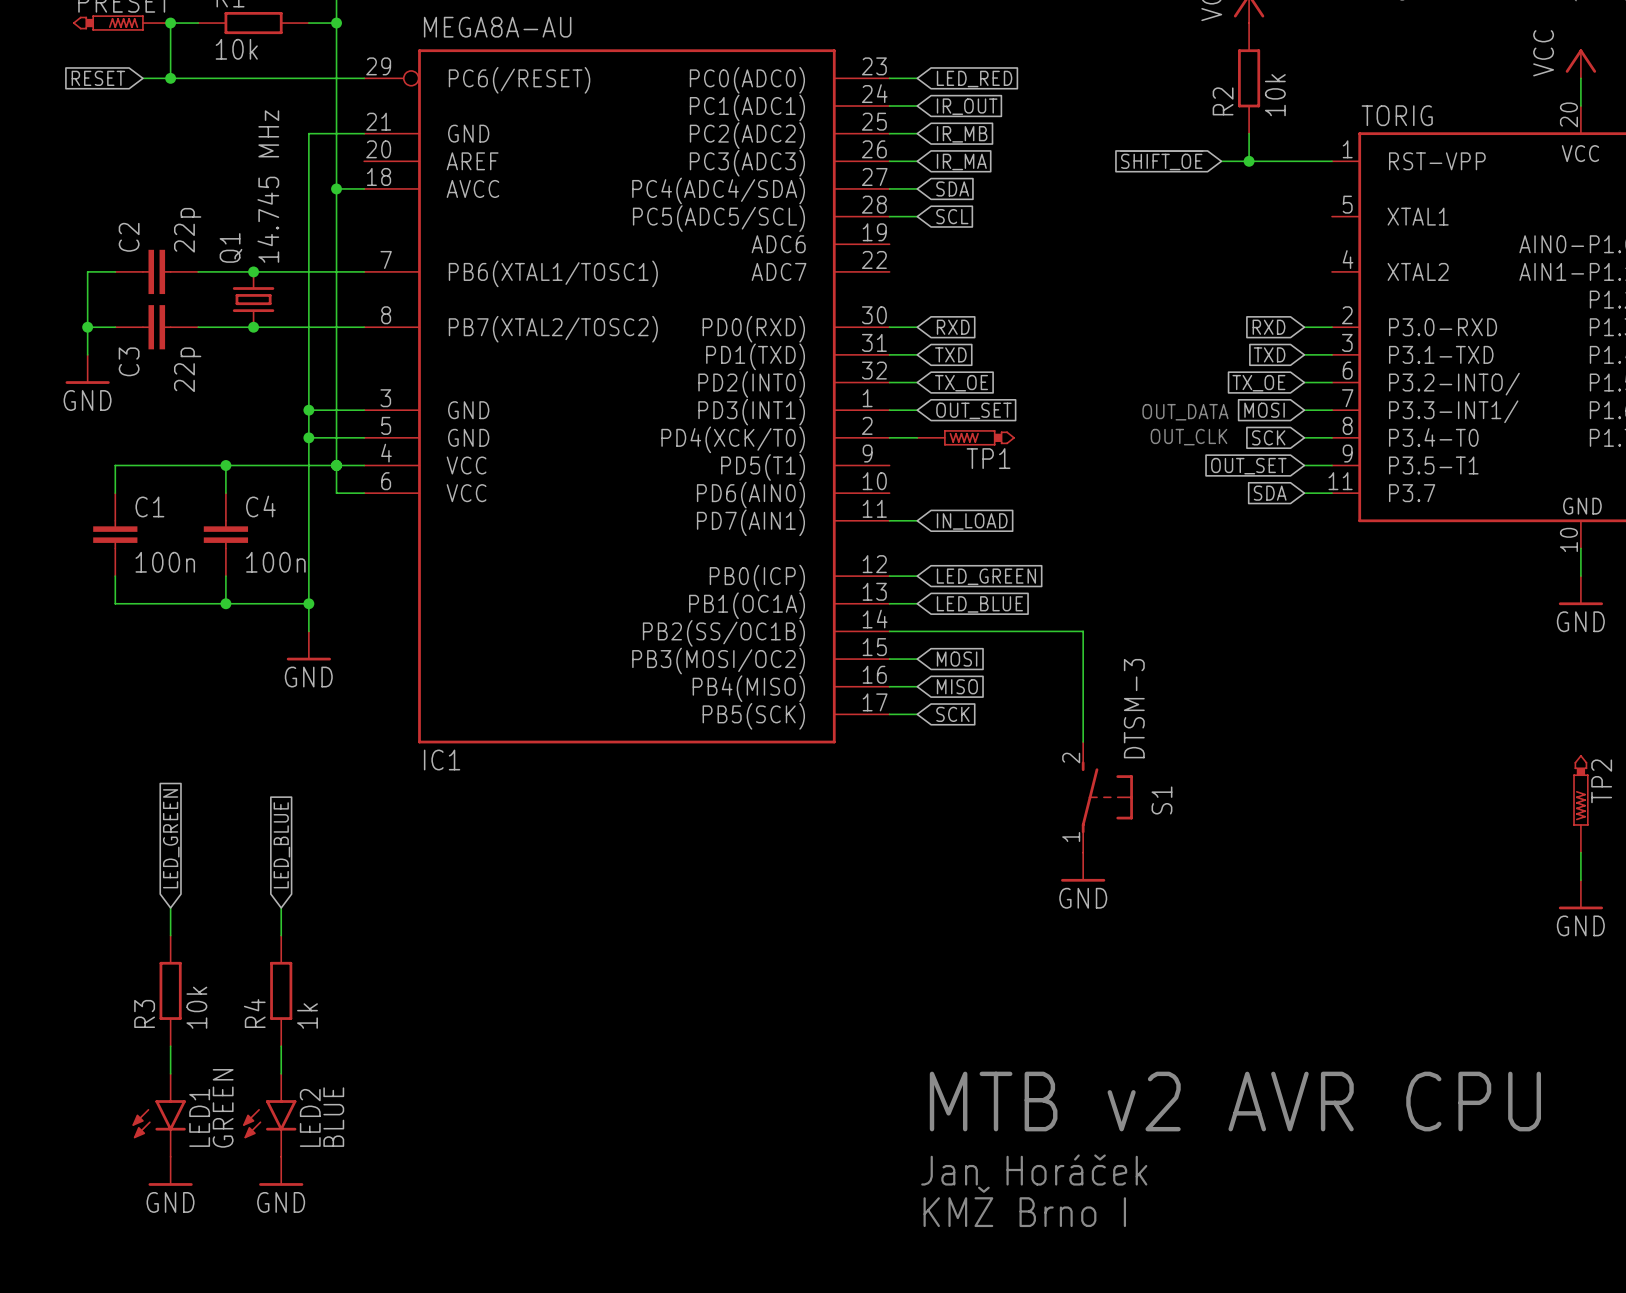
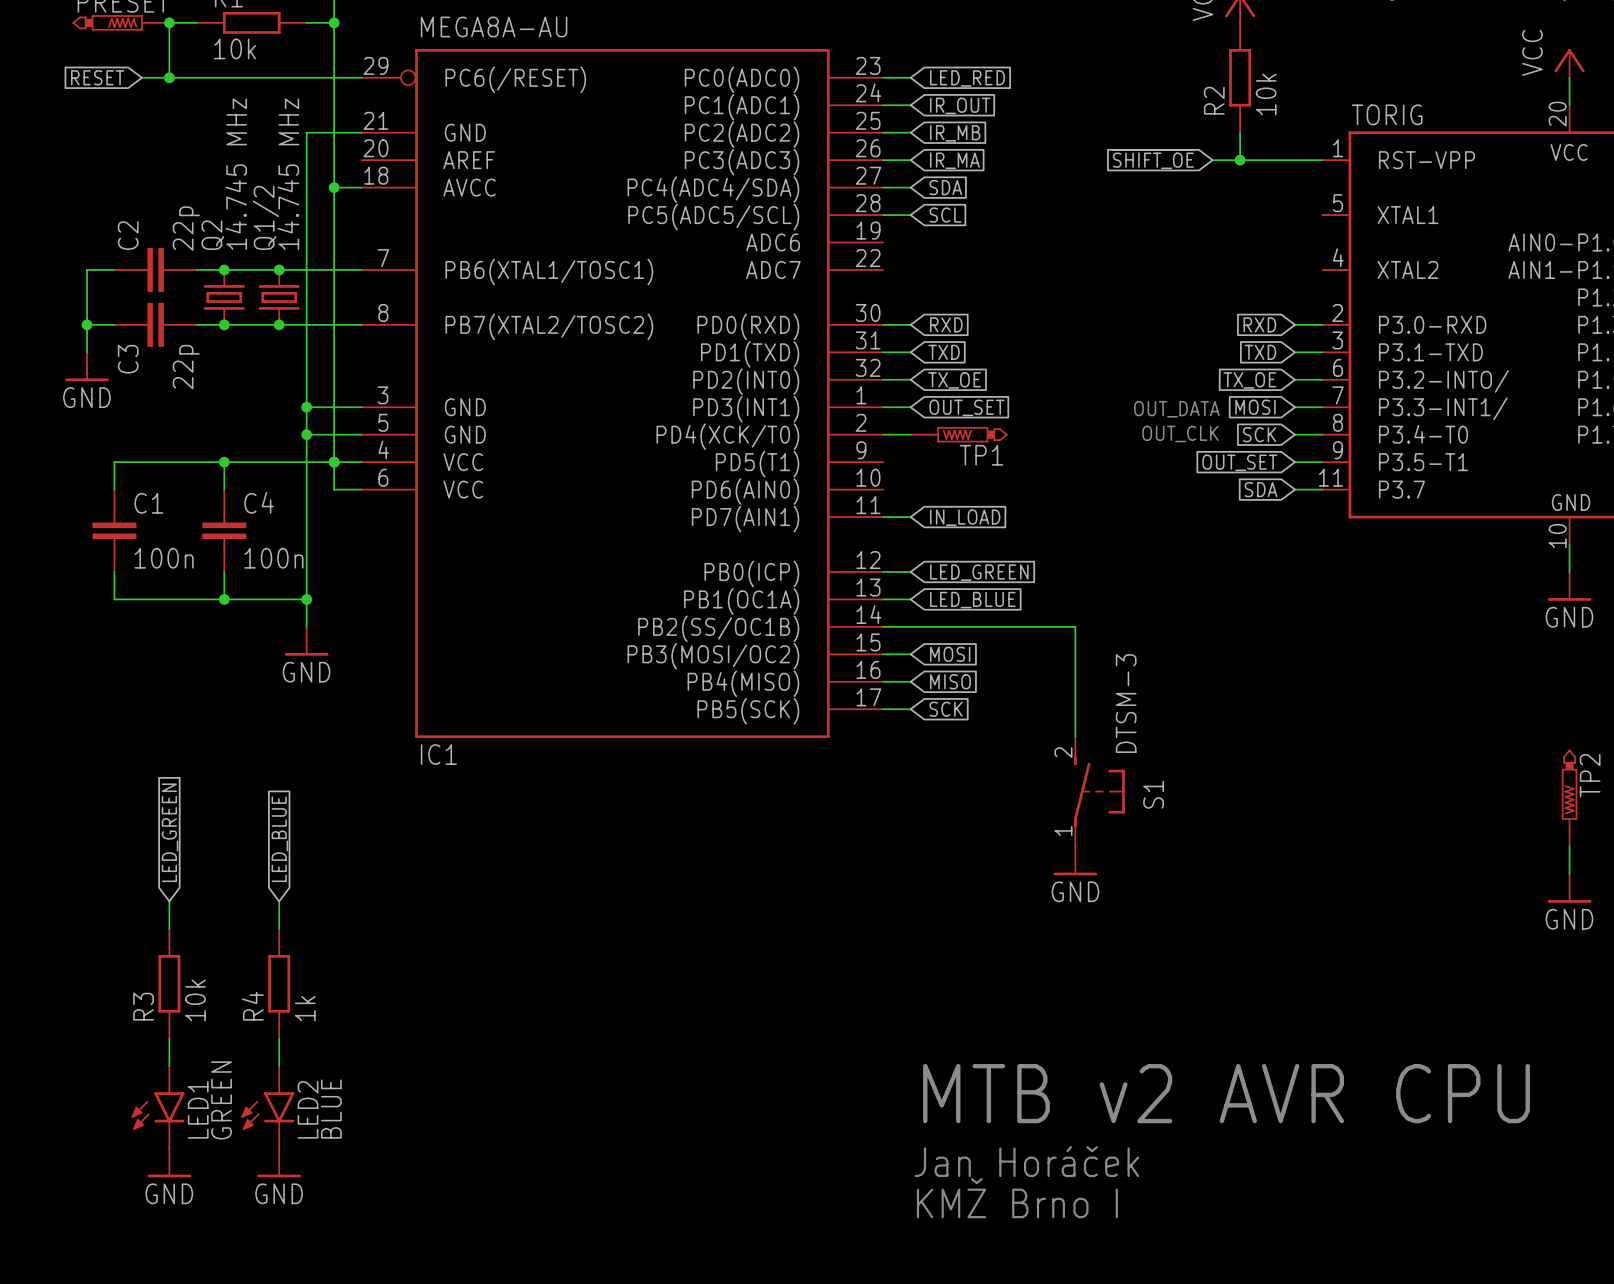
junction: none -> (224, 269)
junction: (253, 271) -> none
junction: none -> (279, 269)
Q2: none -> 14.745 MHz (224, 297)
Q1: 14.745 MHz (253, 299) -> none
Q1/2: none -> 14.745 MHz (279, 297)
junction: none -> (224, 324)
junction: (253, 327) -> none
junction: none -> (279, 324)

